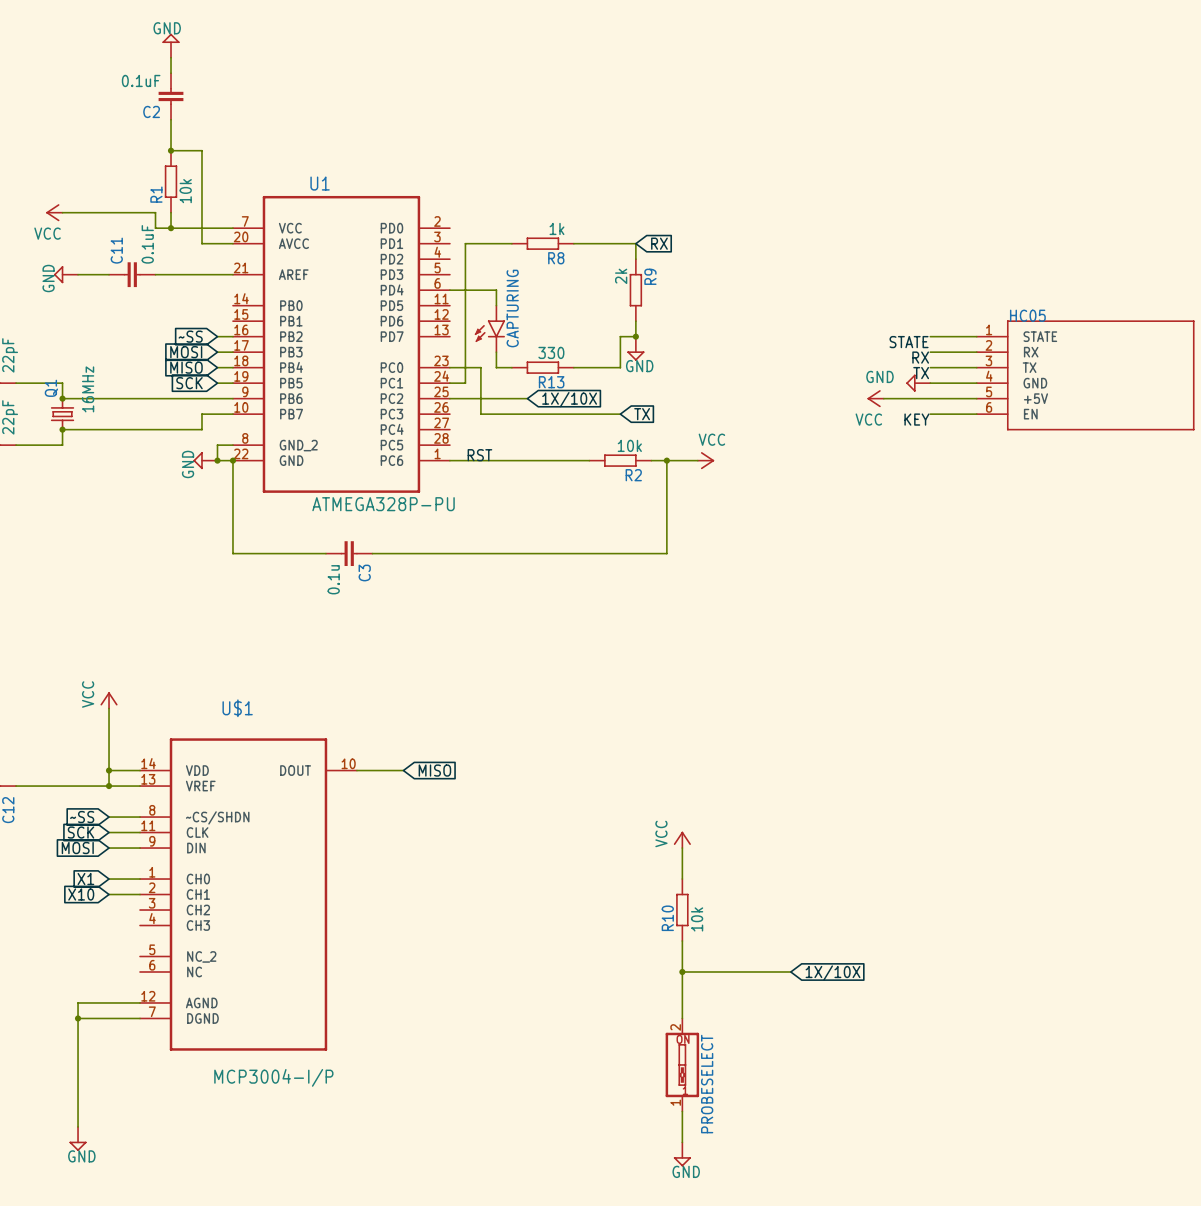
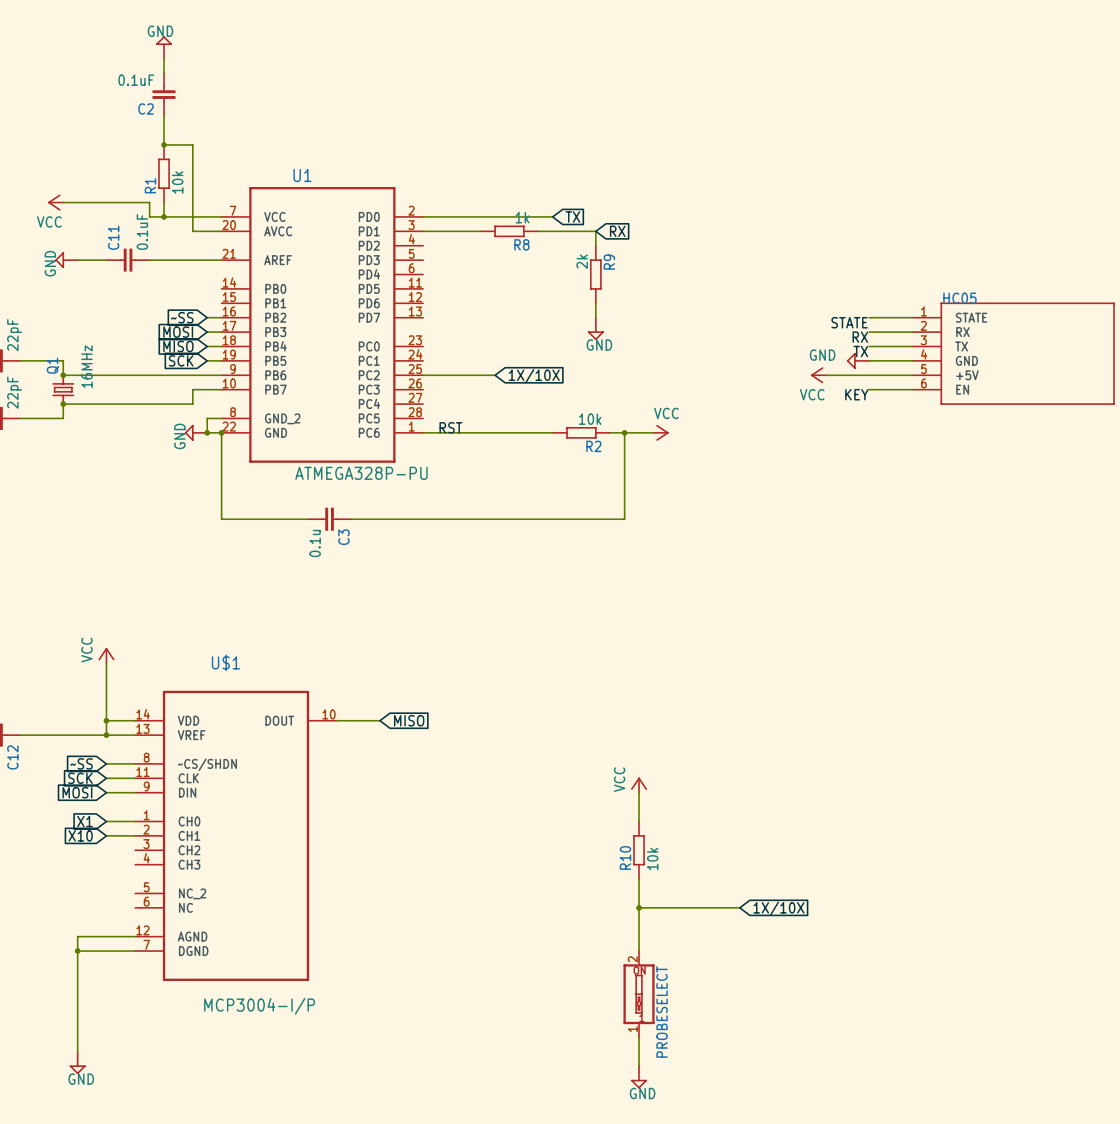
wire: none -> (423, 216) (552, 216)
global label: none -> TX (572, 216)
wire: (465, 243) (465, 383) (449, 383) -> (437, 231) (423, 231)
wire: (449, 290) (496, 290) (496, 305) -> none
CAPTURING: (489, 328) -> none
wire: (635, 336) (620, 336) (620, 367) (573, 367) -> none
junction: (635, 336) -> none
wire: (496, 352) (496, 367) (511, 367) -> none
wire: (449, 367) (480, 367) (480, 414) (620, 414) -> none
R13: 330 (542, 367) -> none
global label: TX (642, 414) -> none

